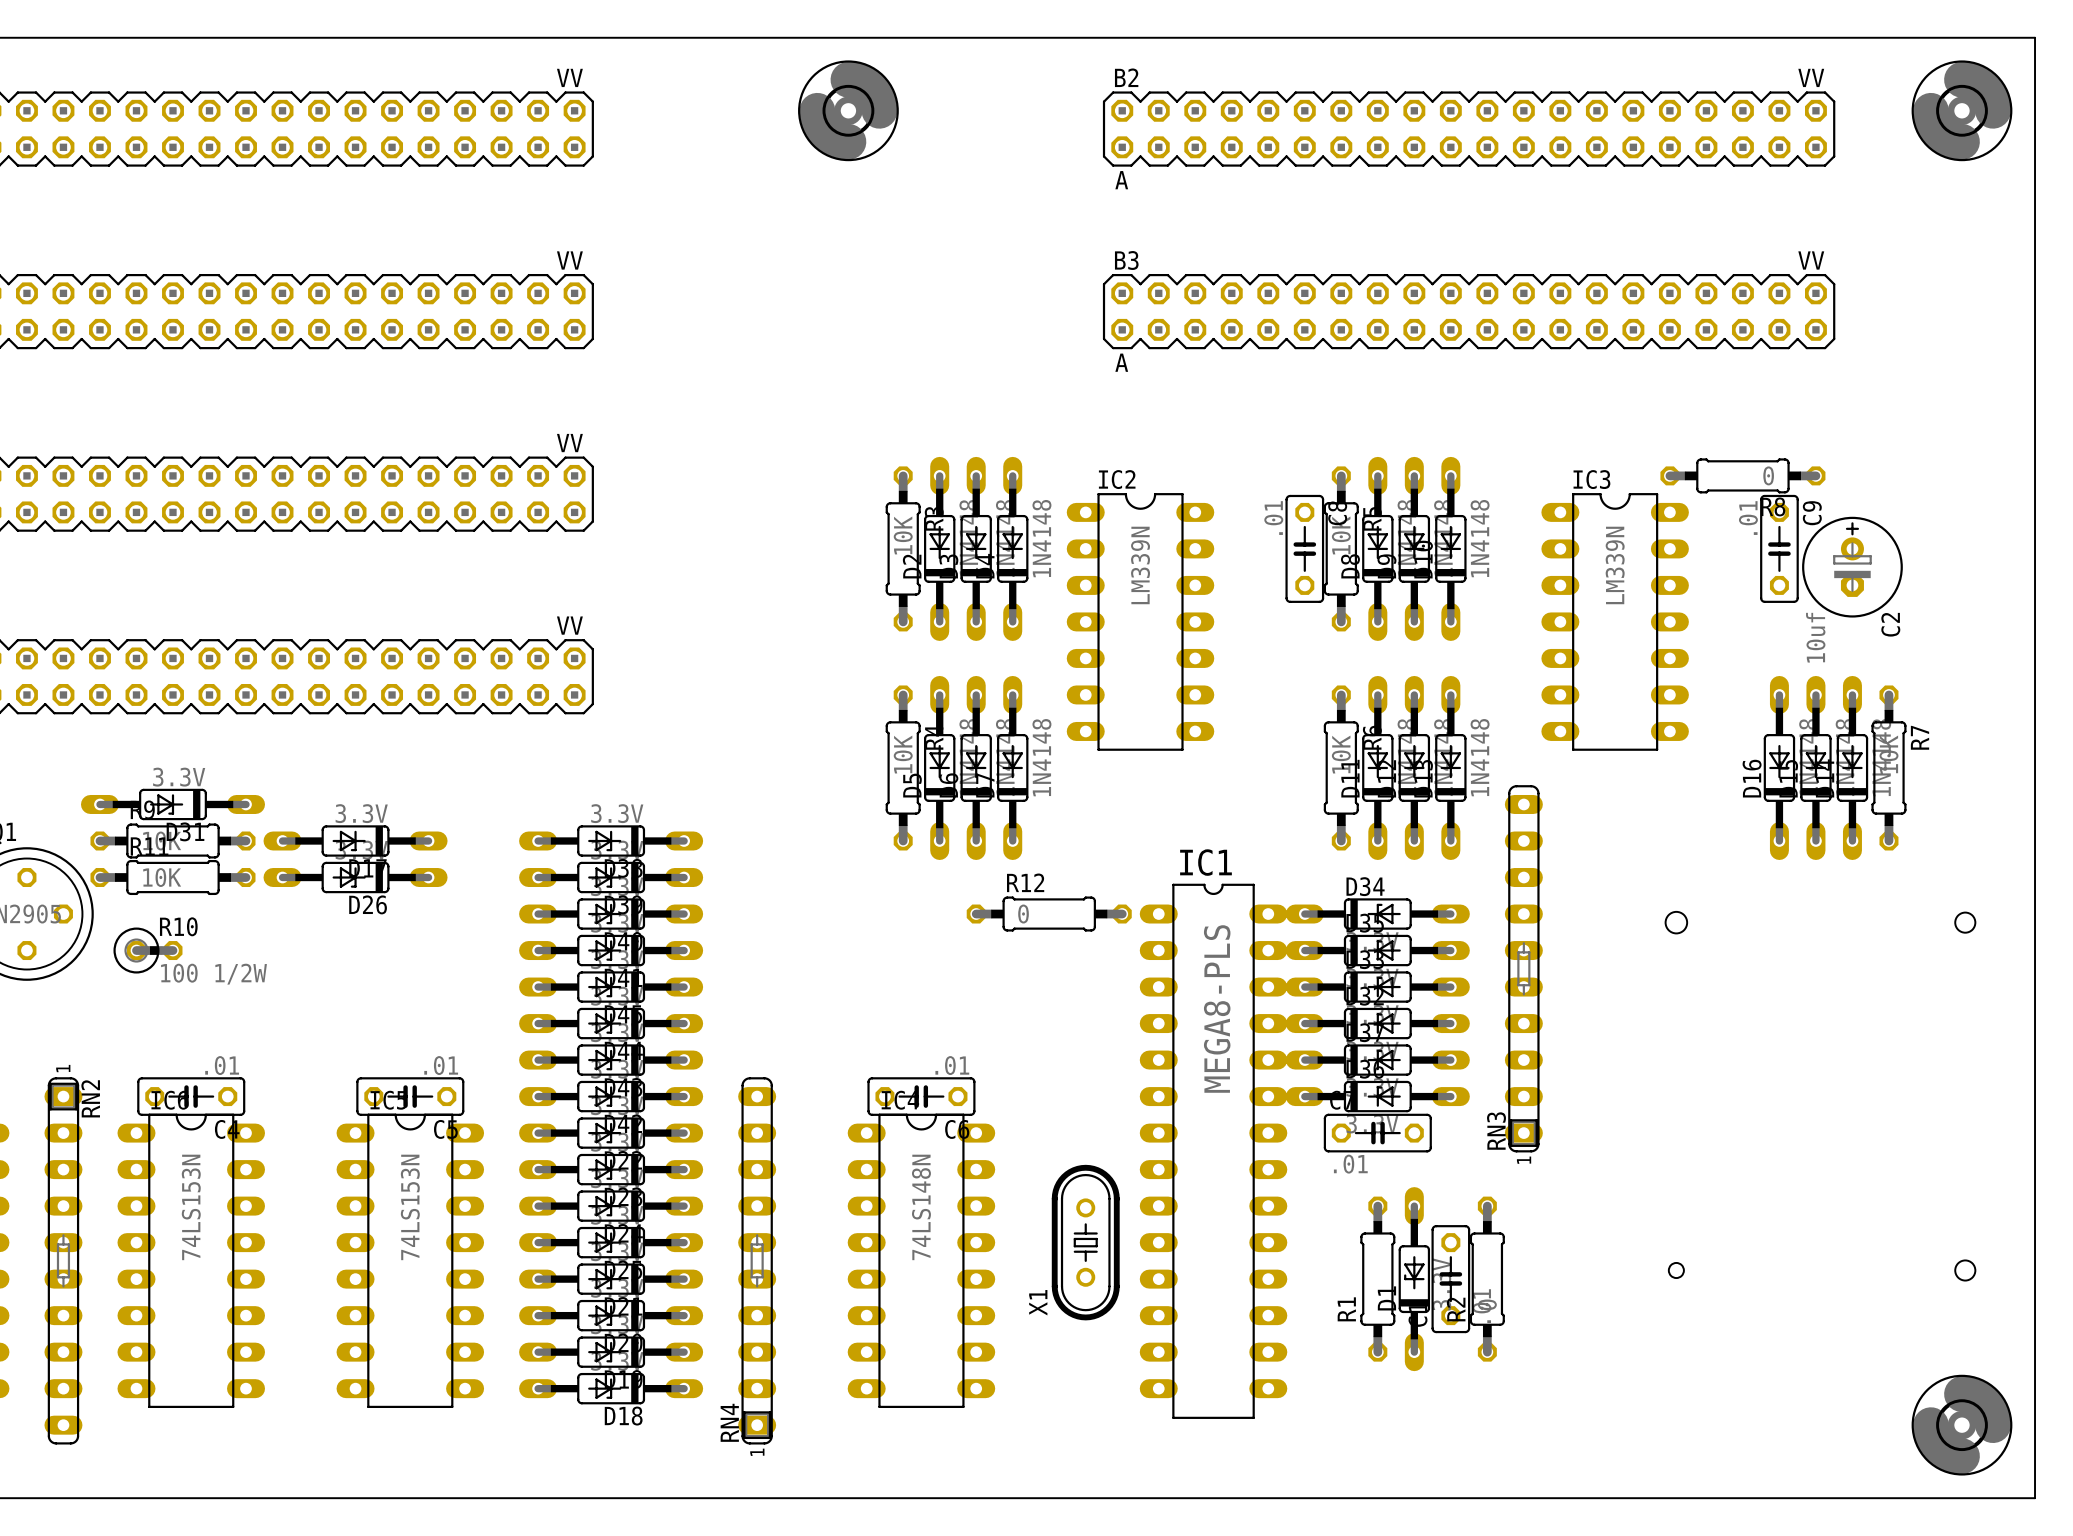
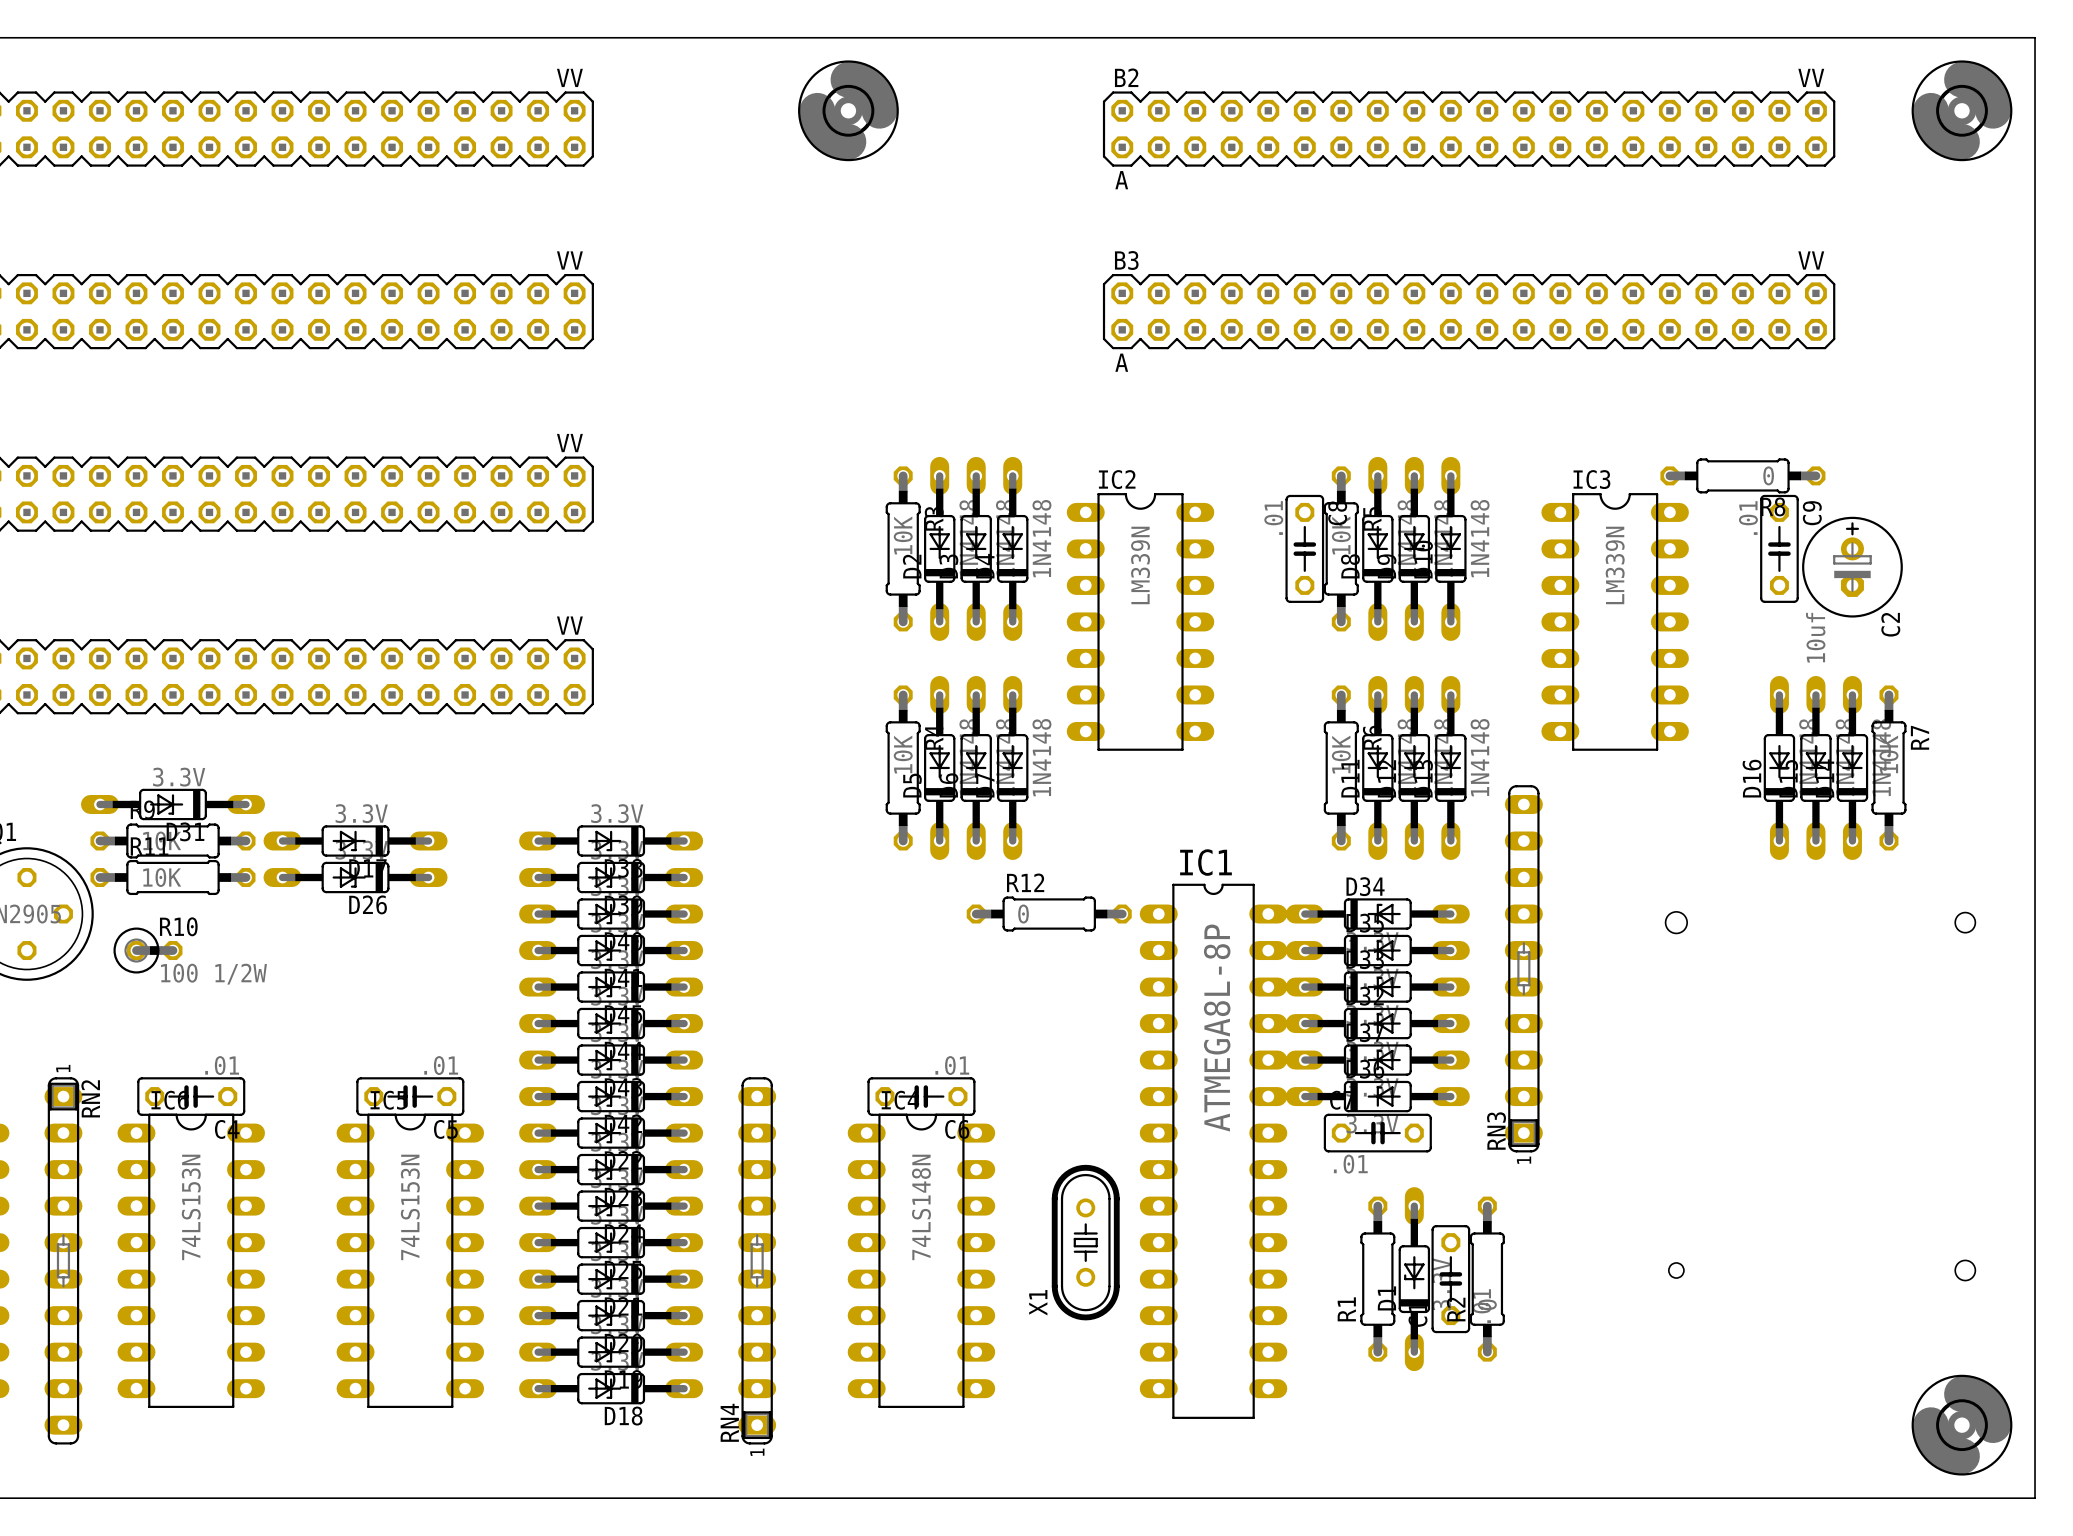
IC1 value: MEGA8-PLS (1217, 1009) -> ATMEGA8L-8P (1217, 1028)

